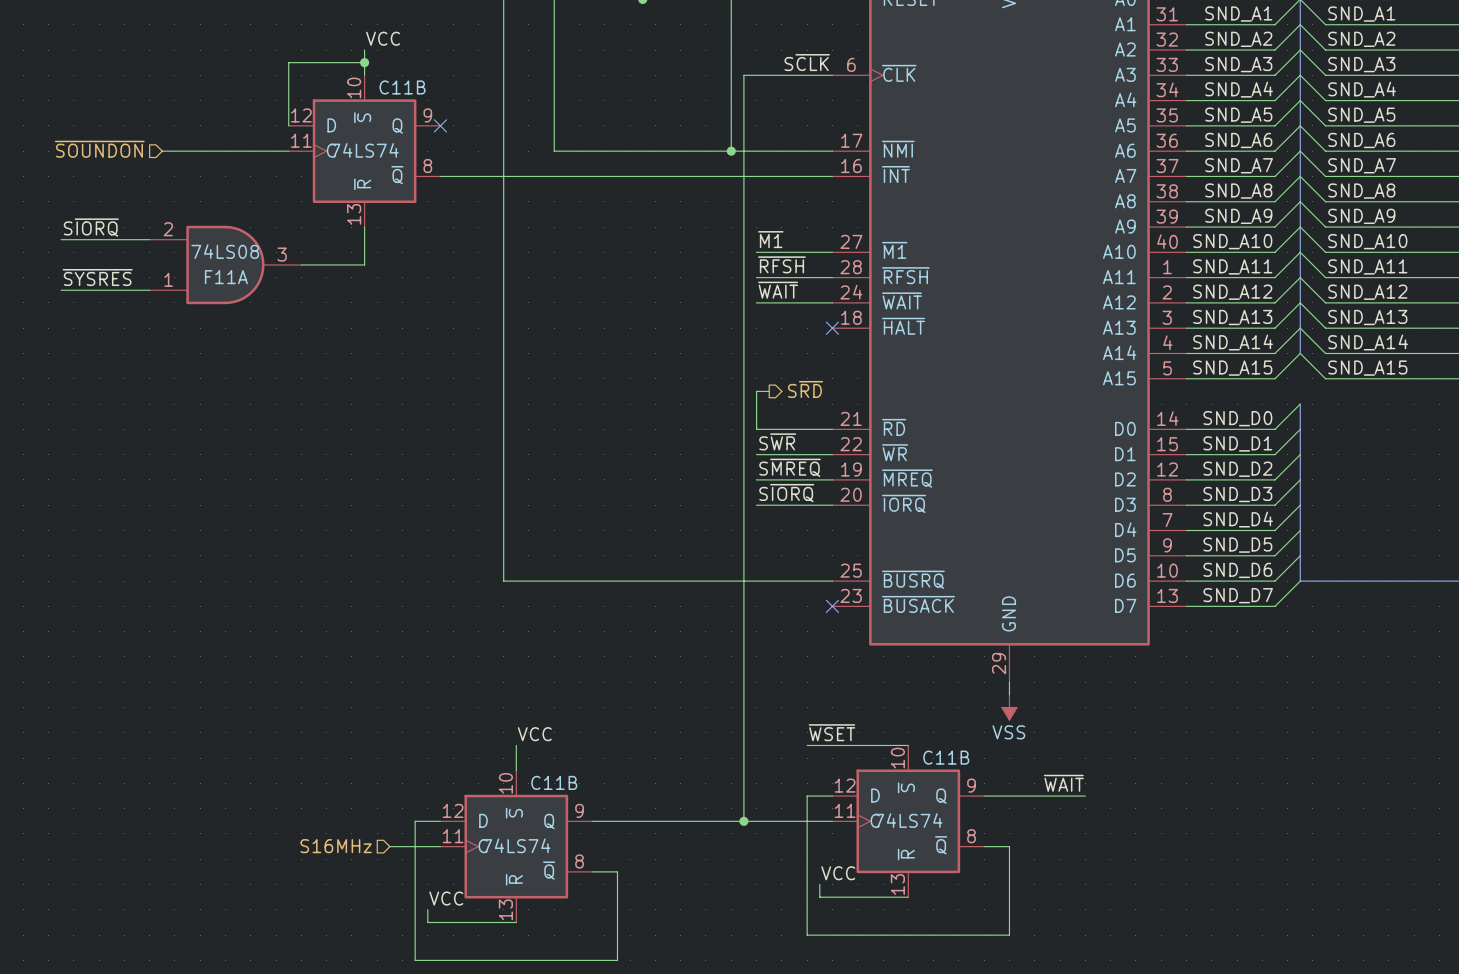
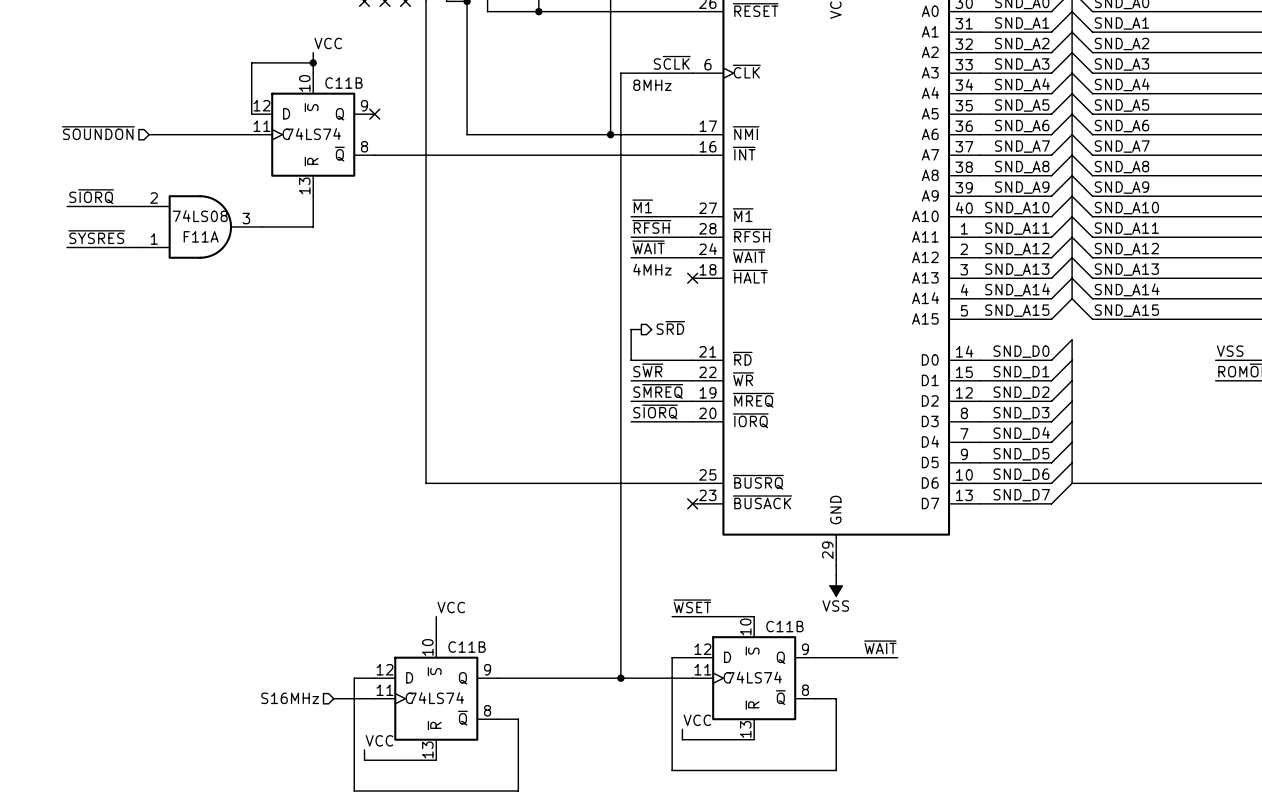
text: none -> 8MHz (652, 85)
text: none -> 4MHz (652, 269)

